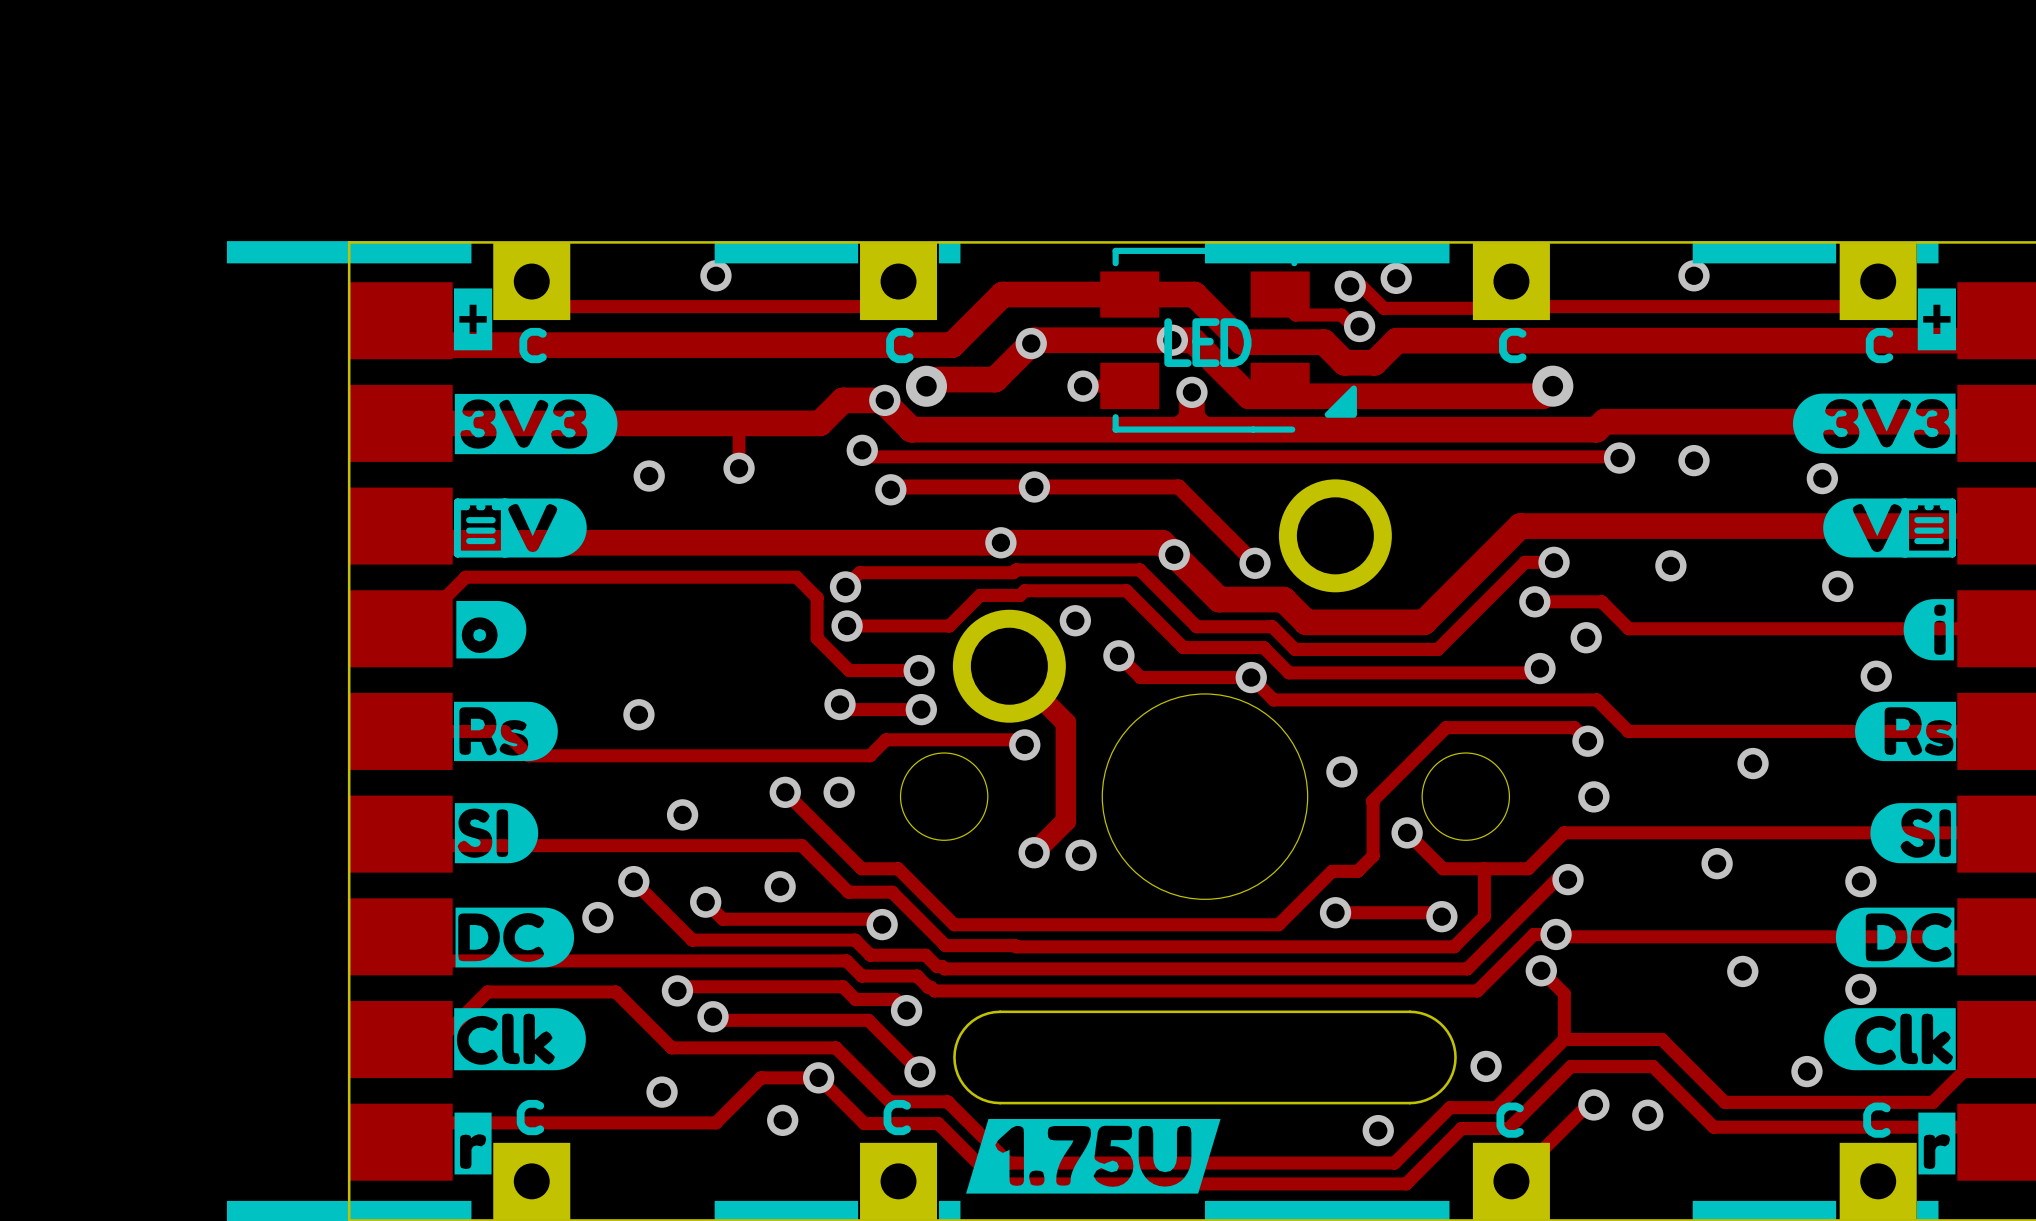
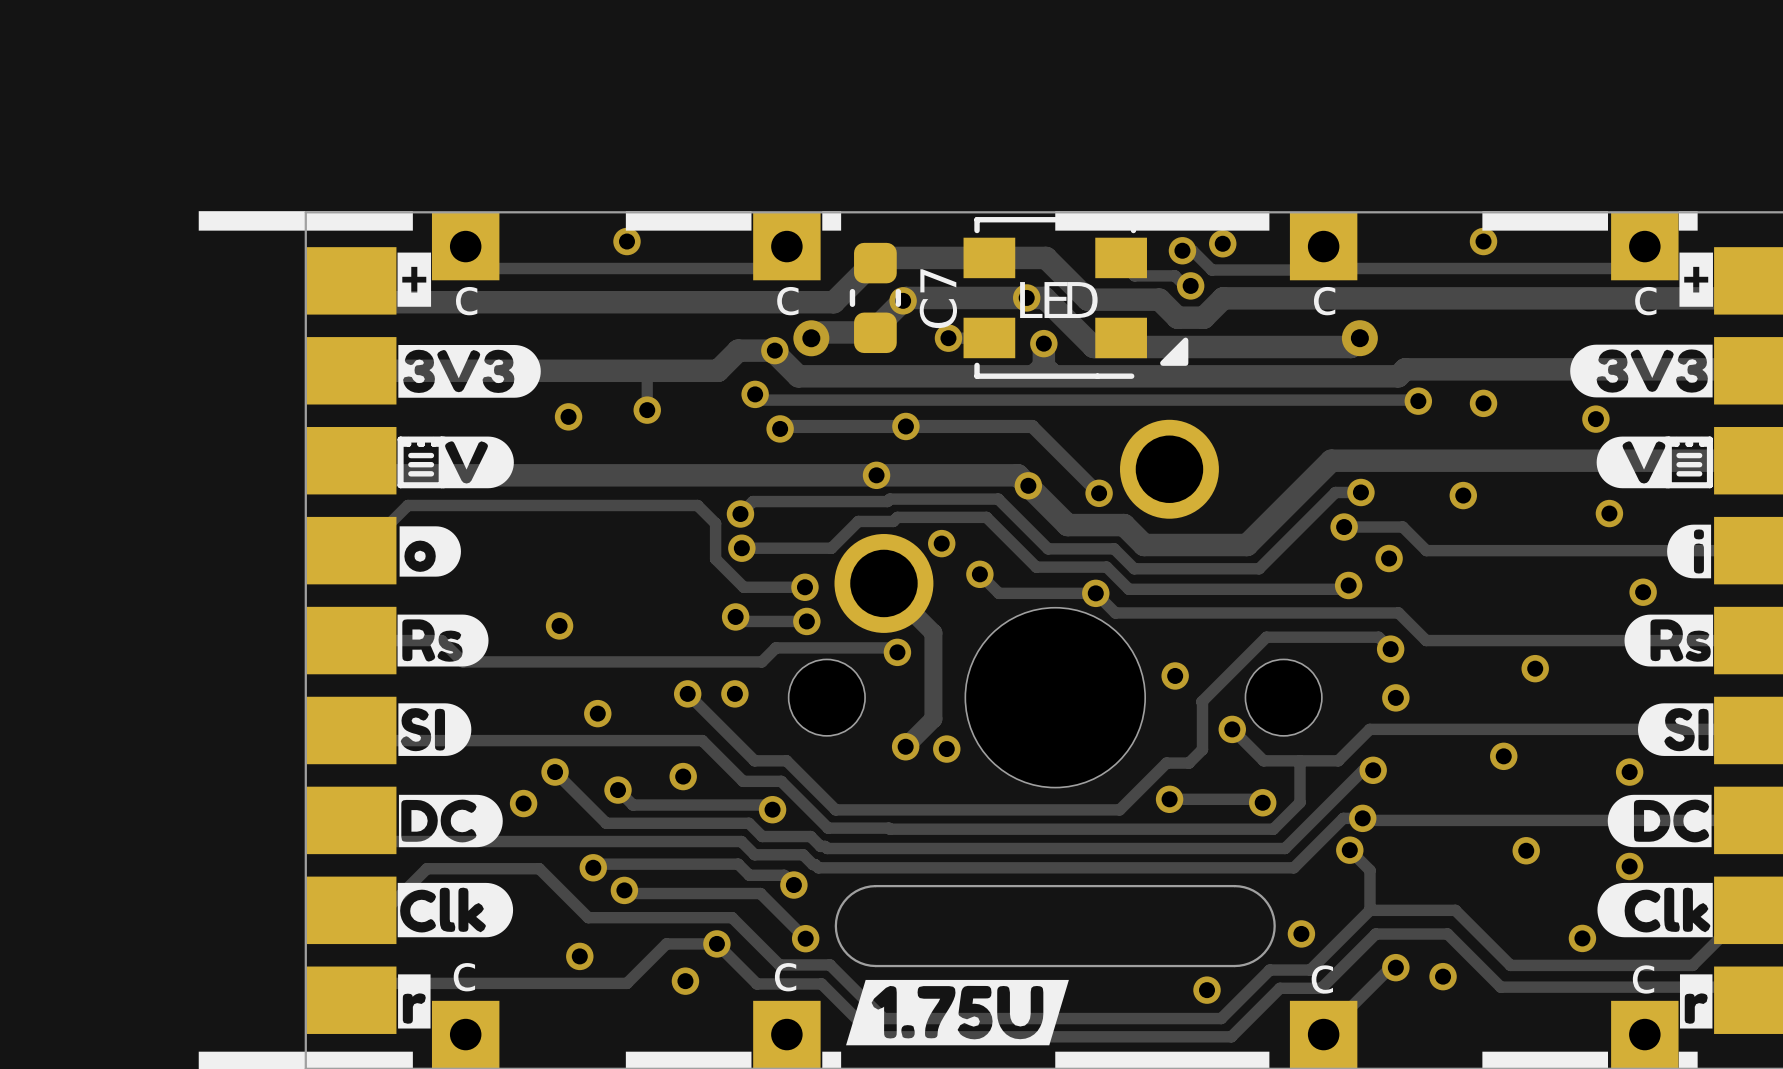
C7: none -> (875, 297)

